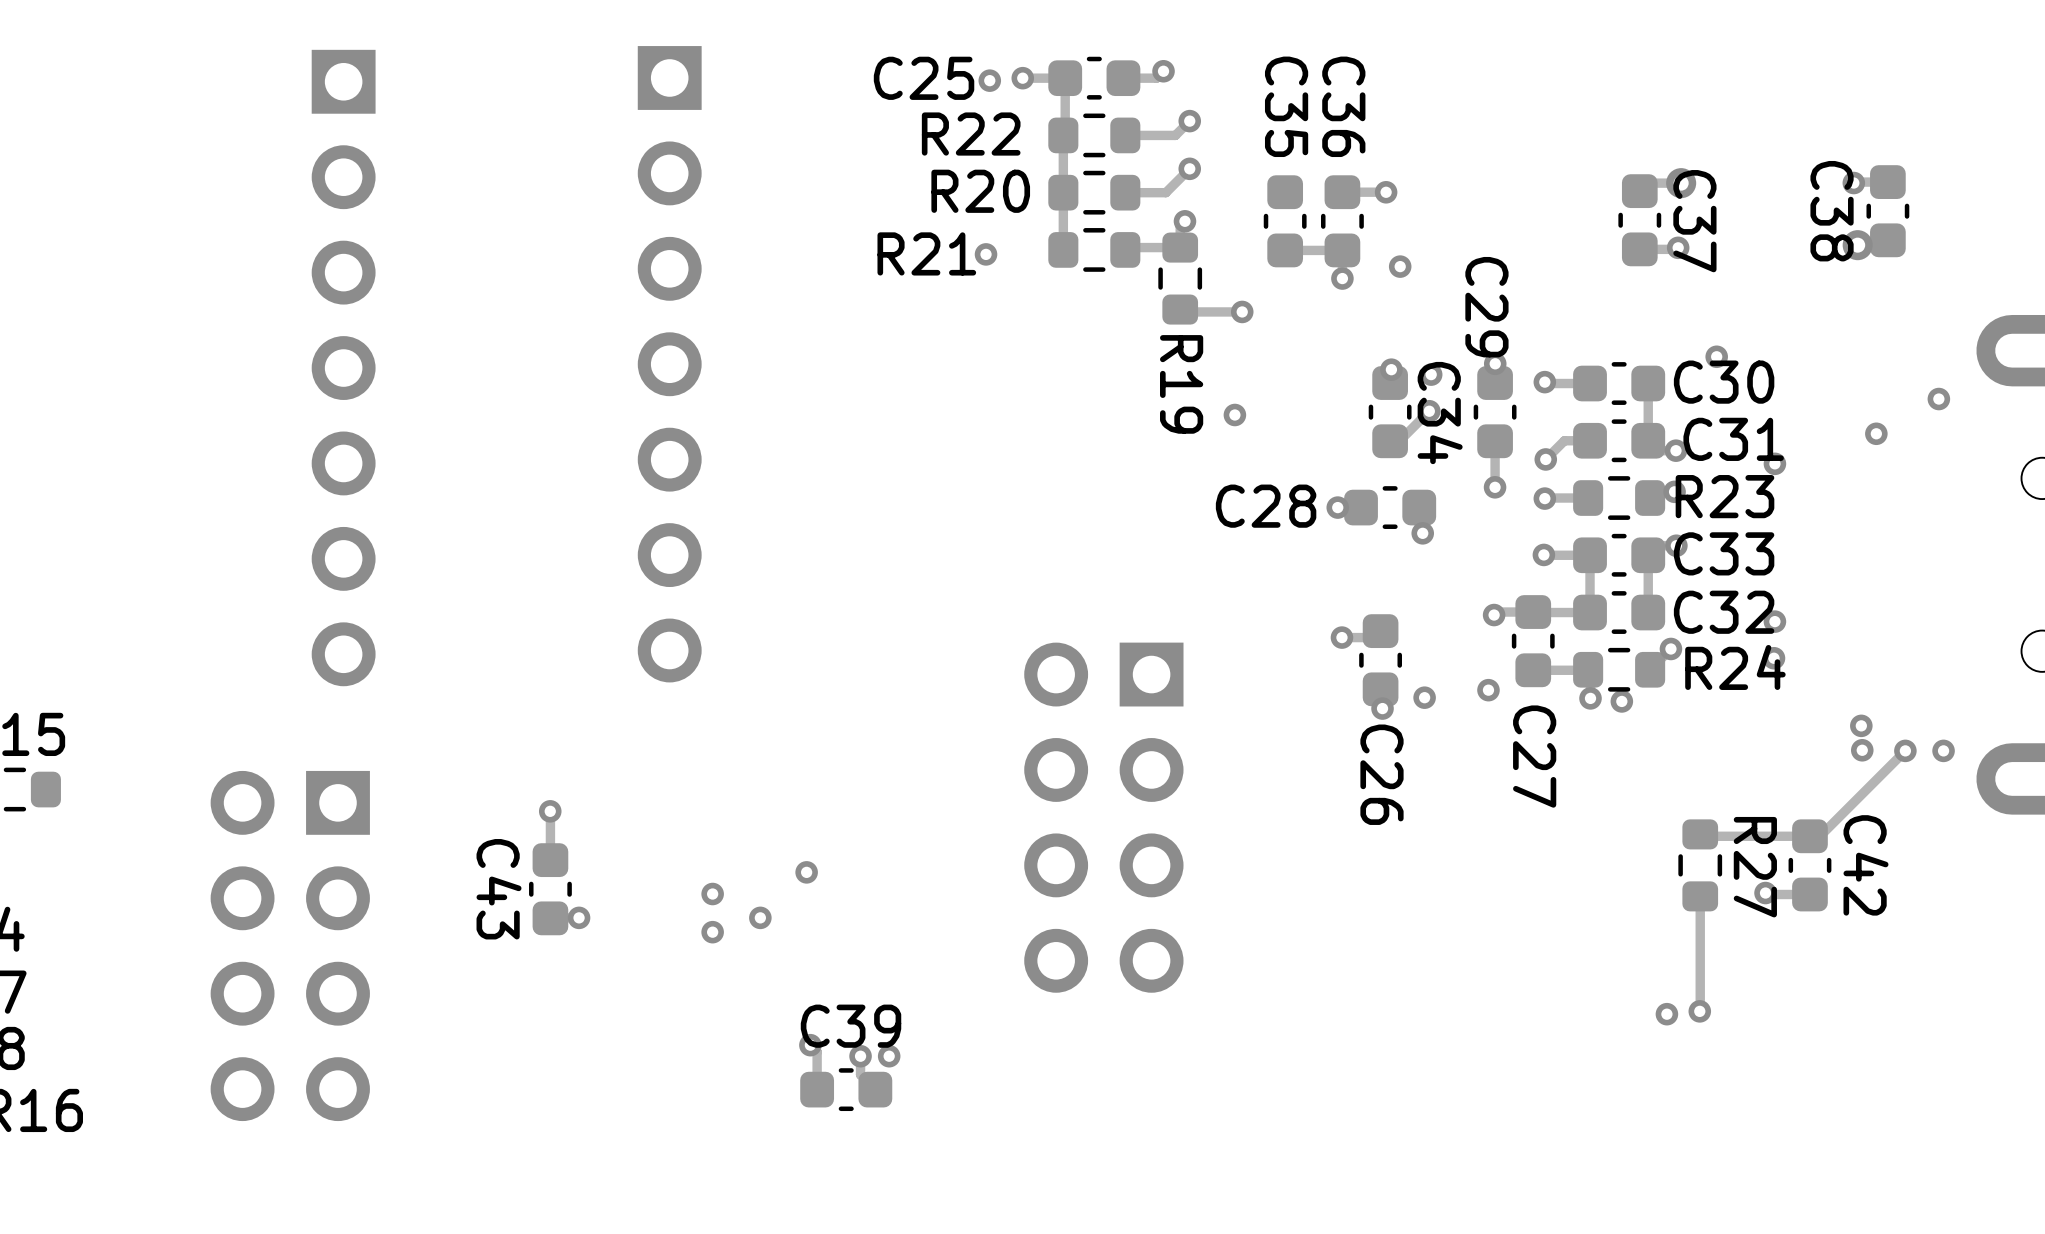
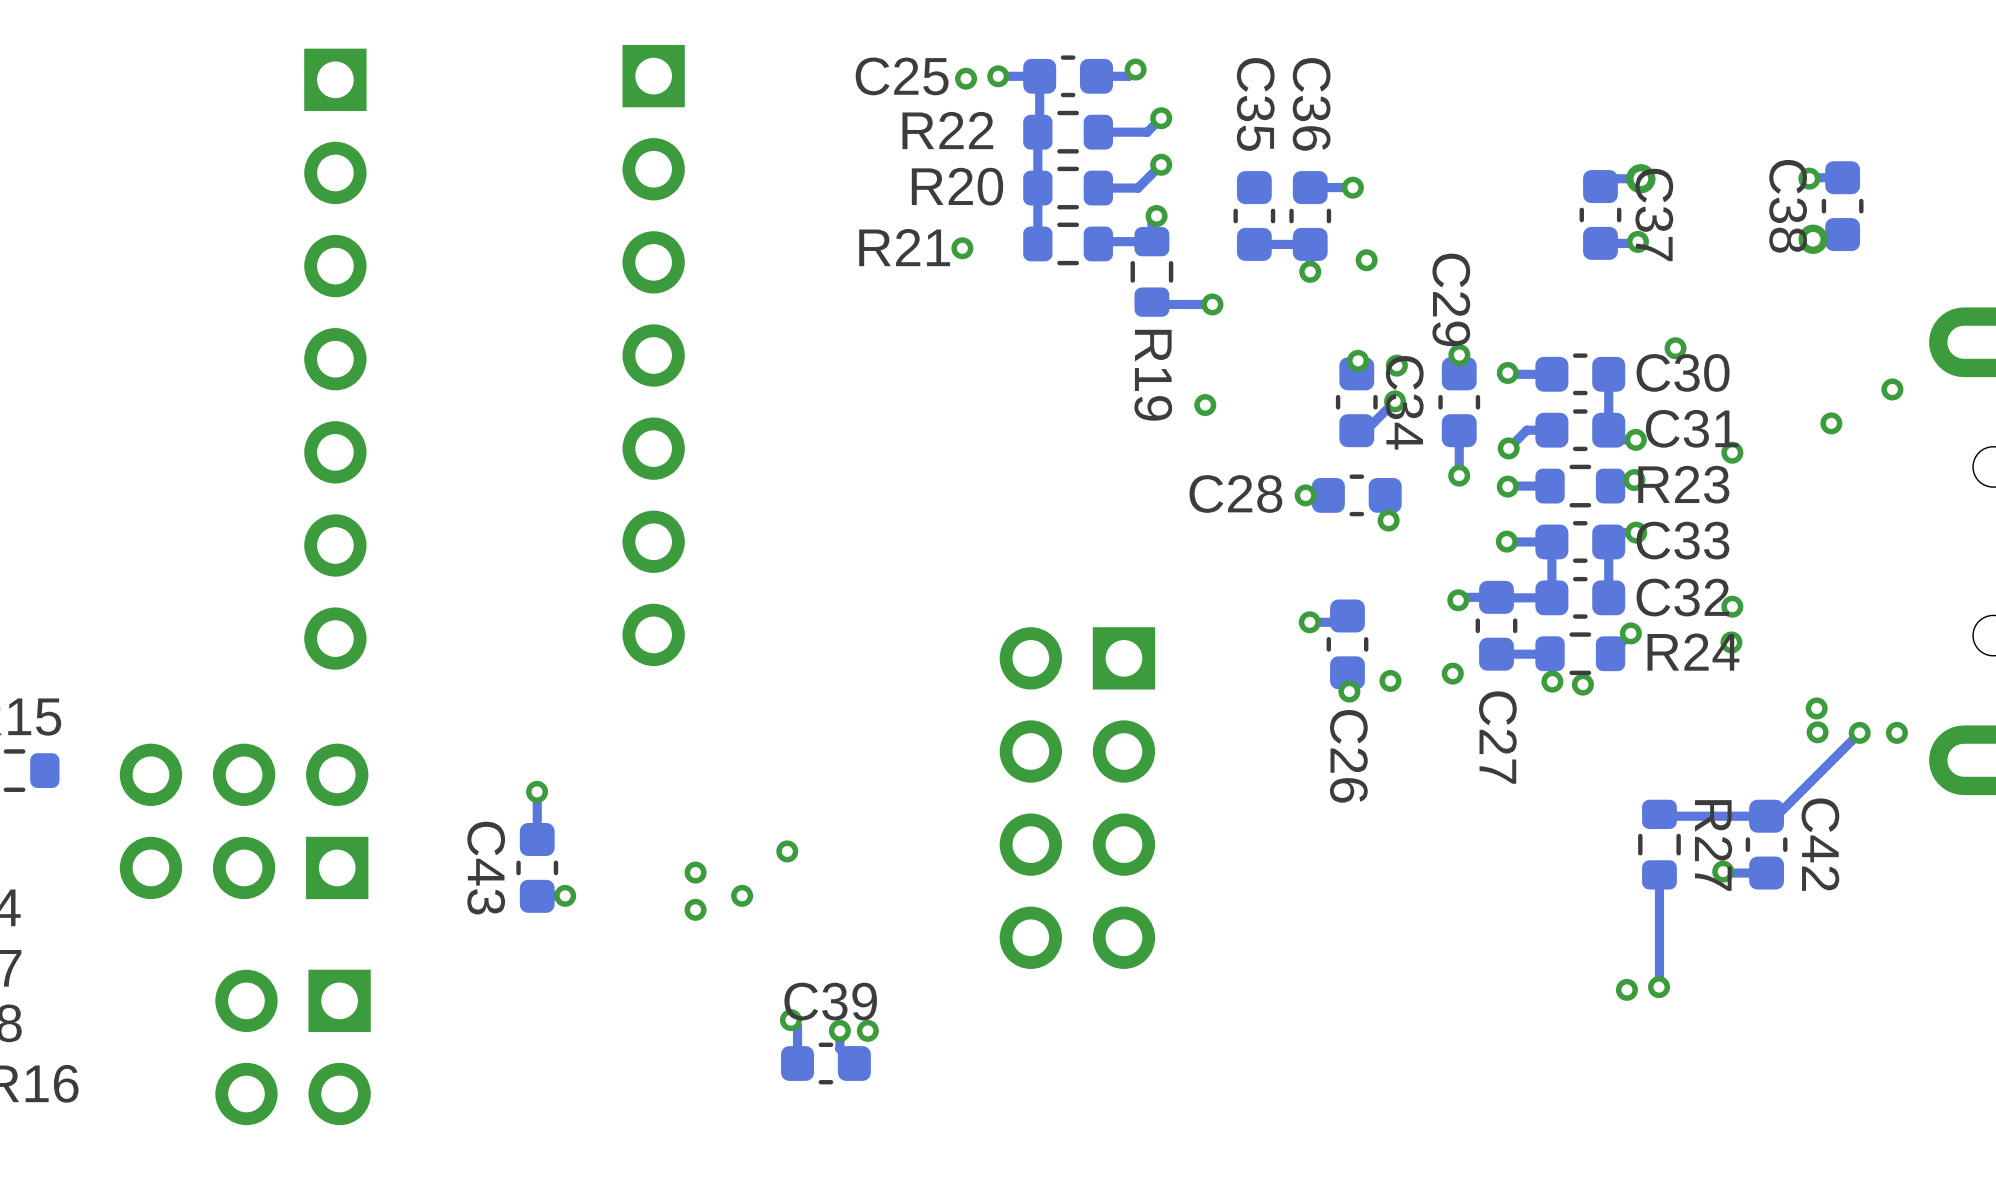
part: none -> (244, 821)
part: (290, 946) -> none
part: none -> (293, 1047)

